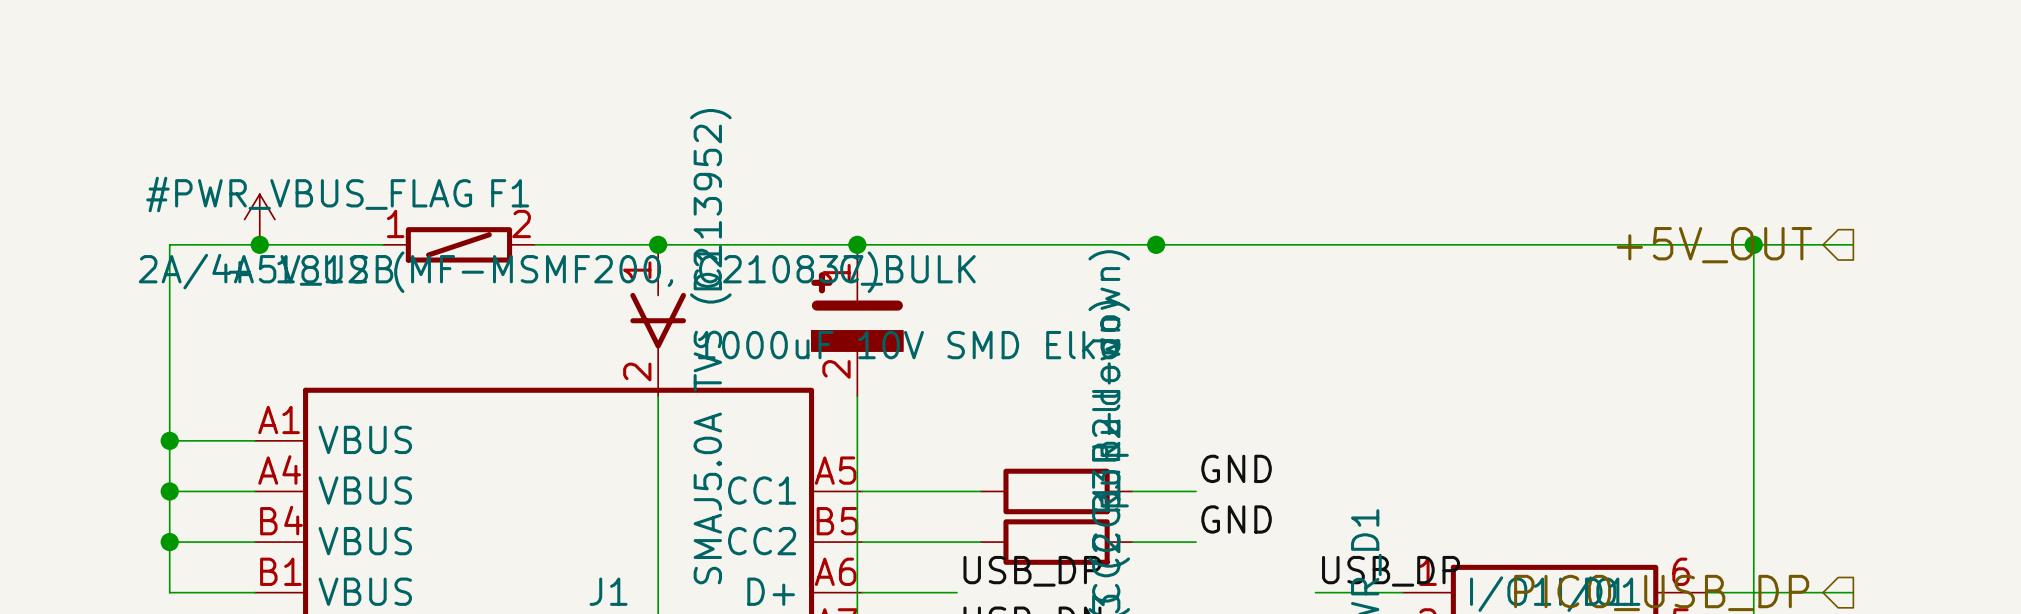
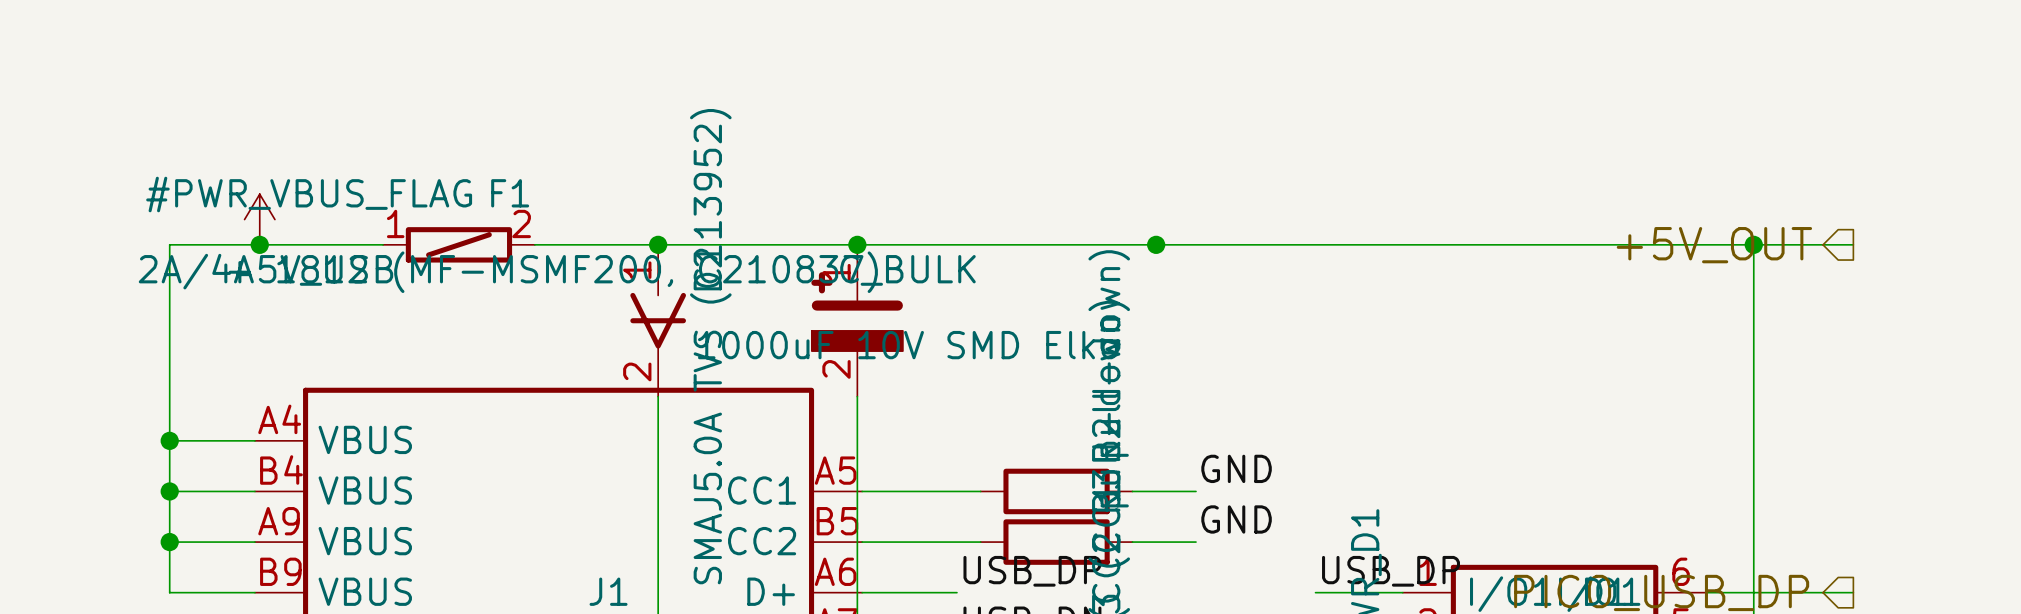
J1 pin number: A1 (279, 419) -> A4 (279, 419)
J1 pin number: A4 (279, 469) -> B4 (281, 469)
J1 pin number: B4 (281, 520) -> A9 (279, 521)
J1 pin number: B1 (280, 571) -> B9 (280, 571)

